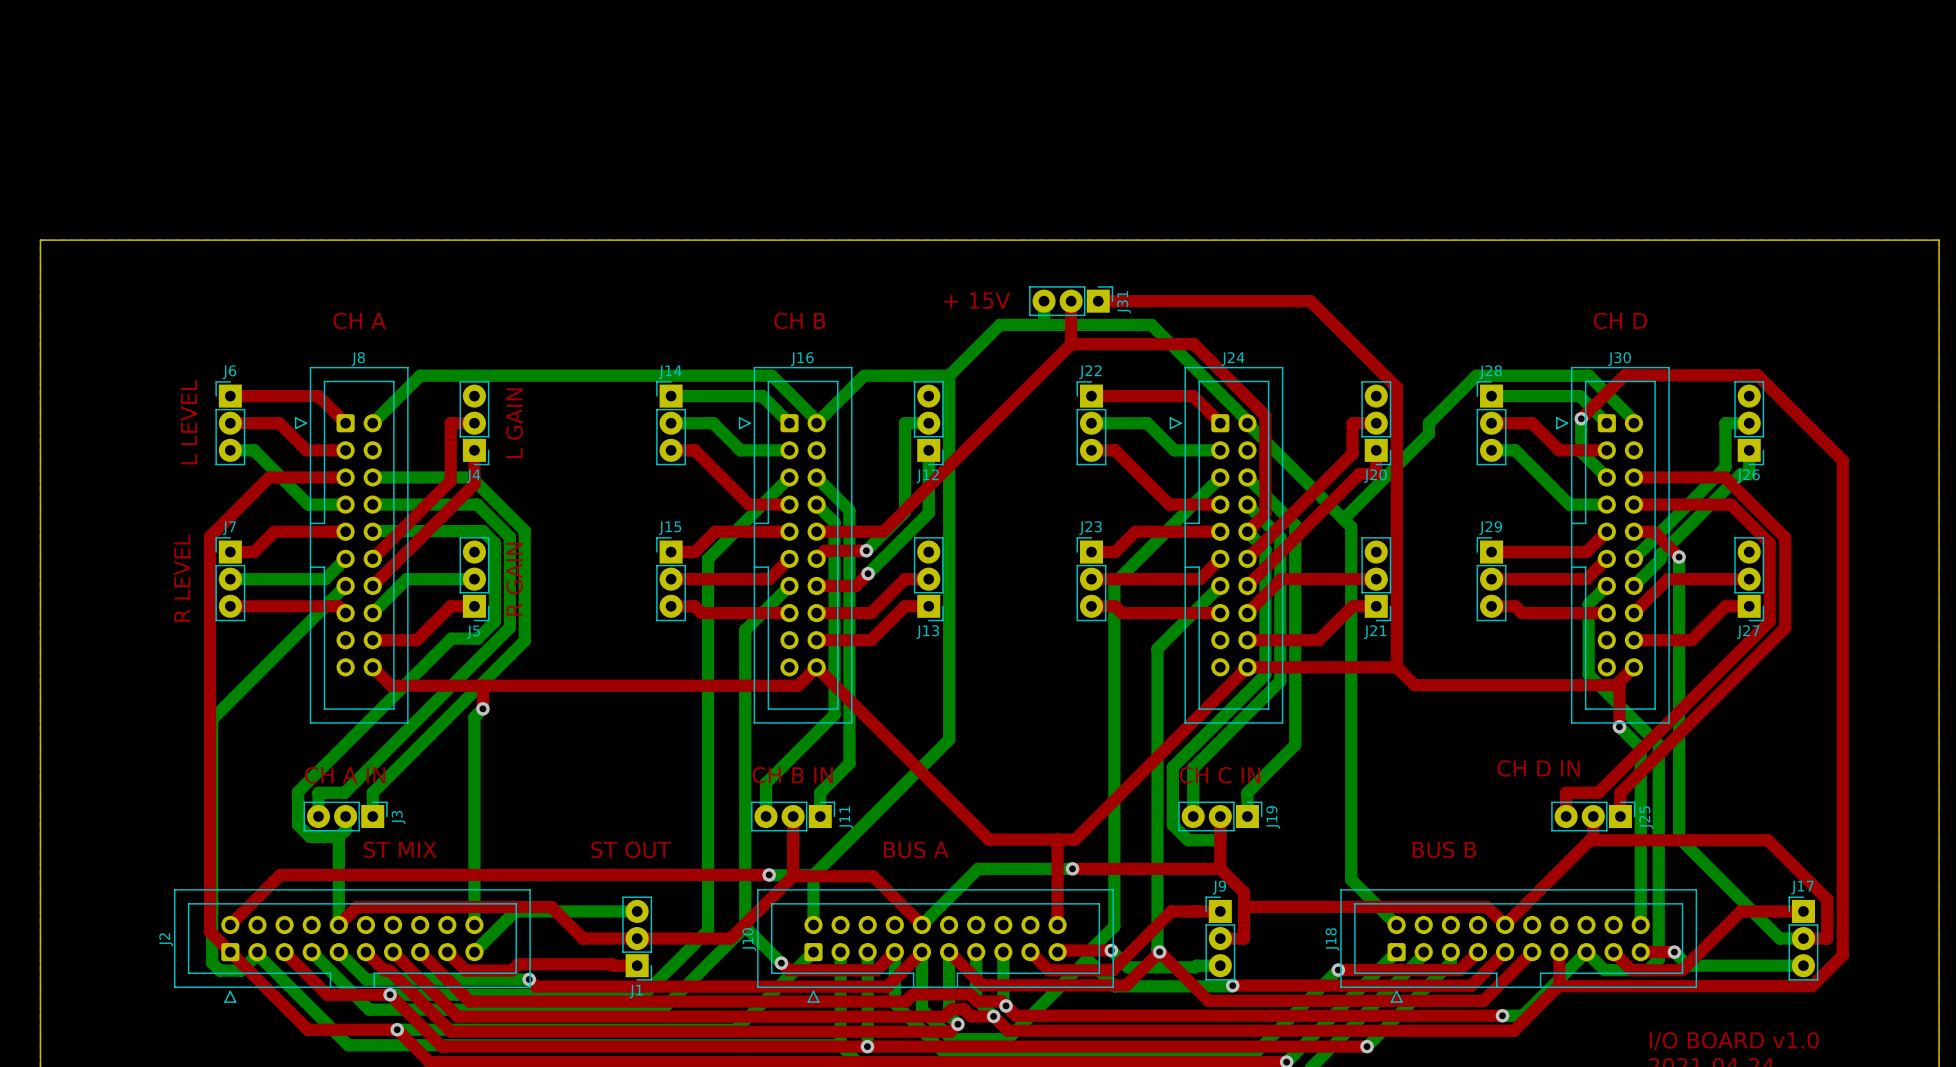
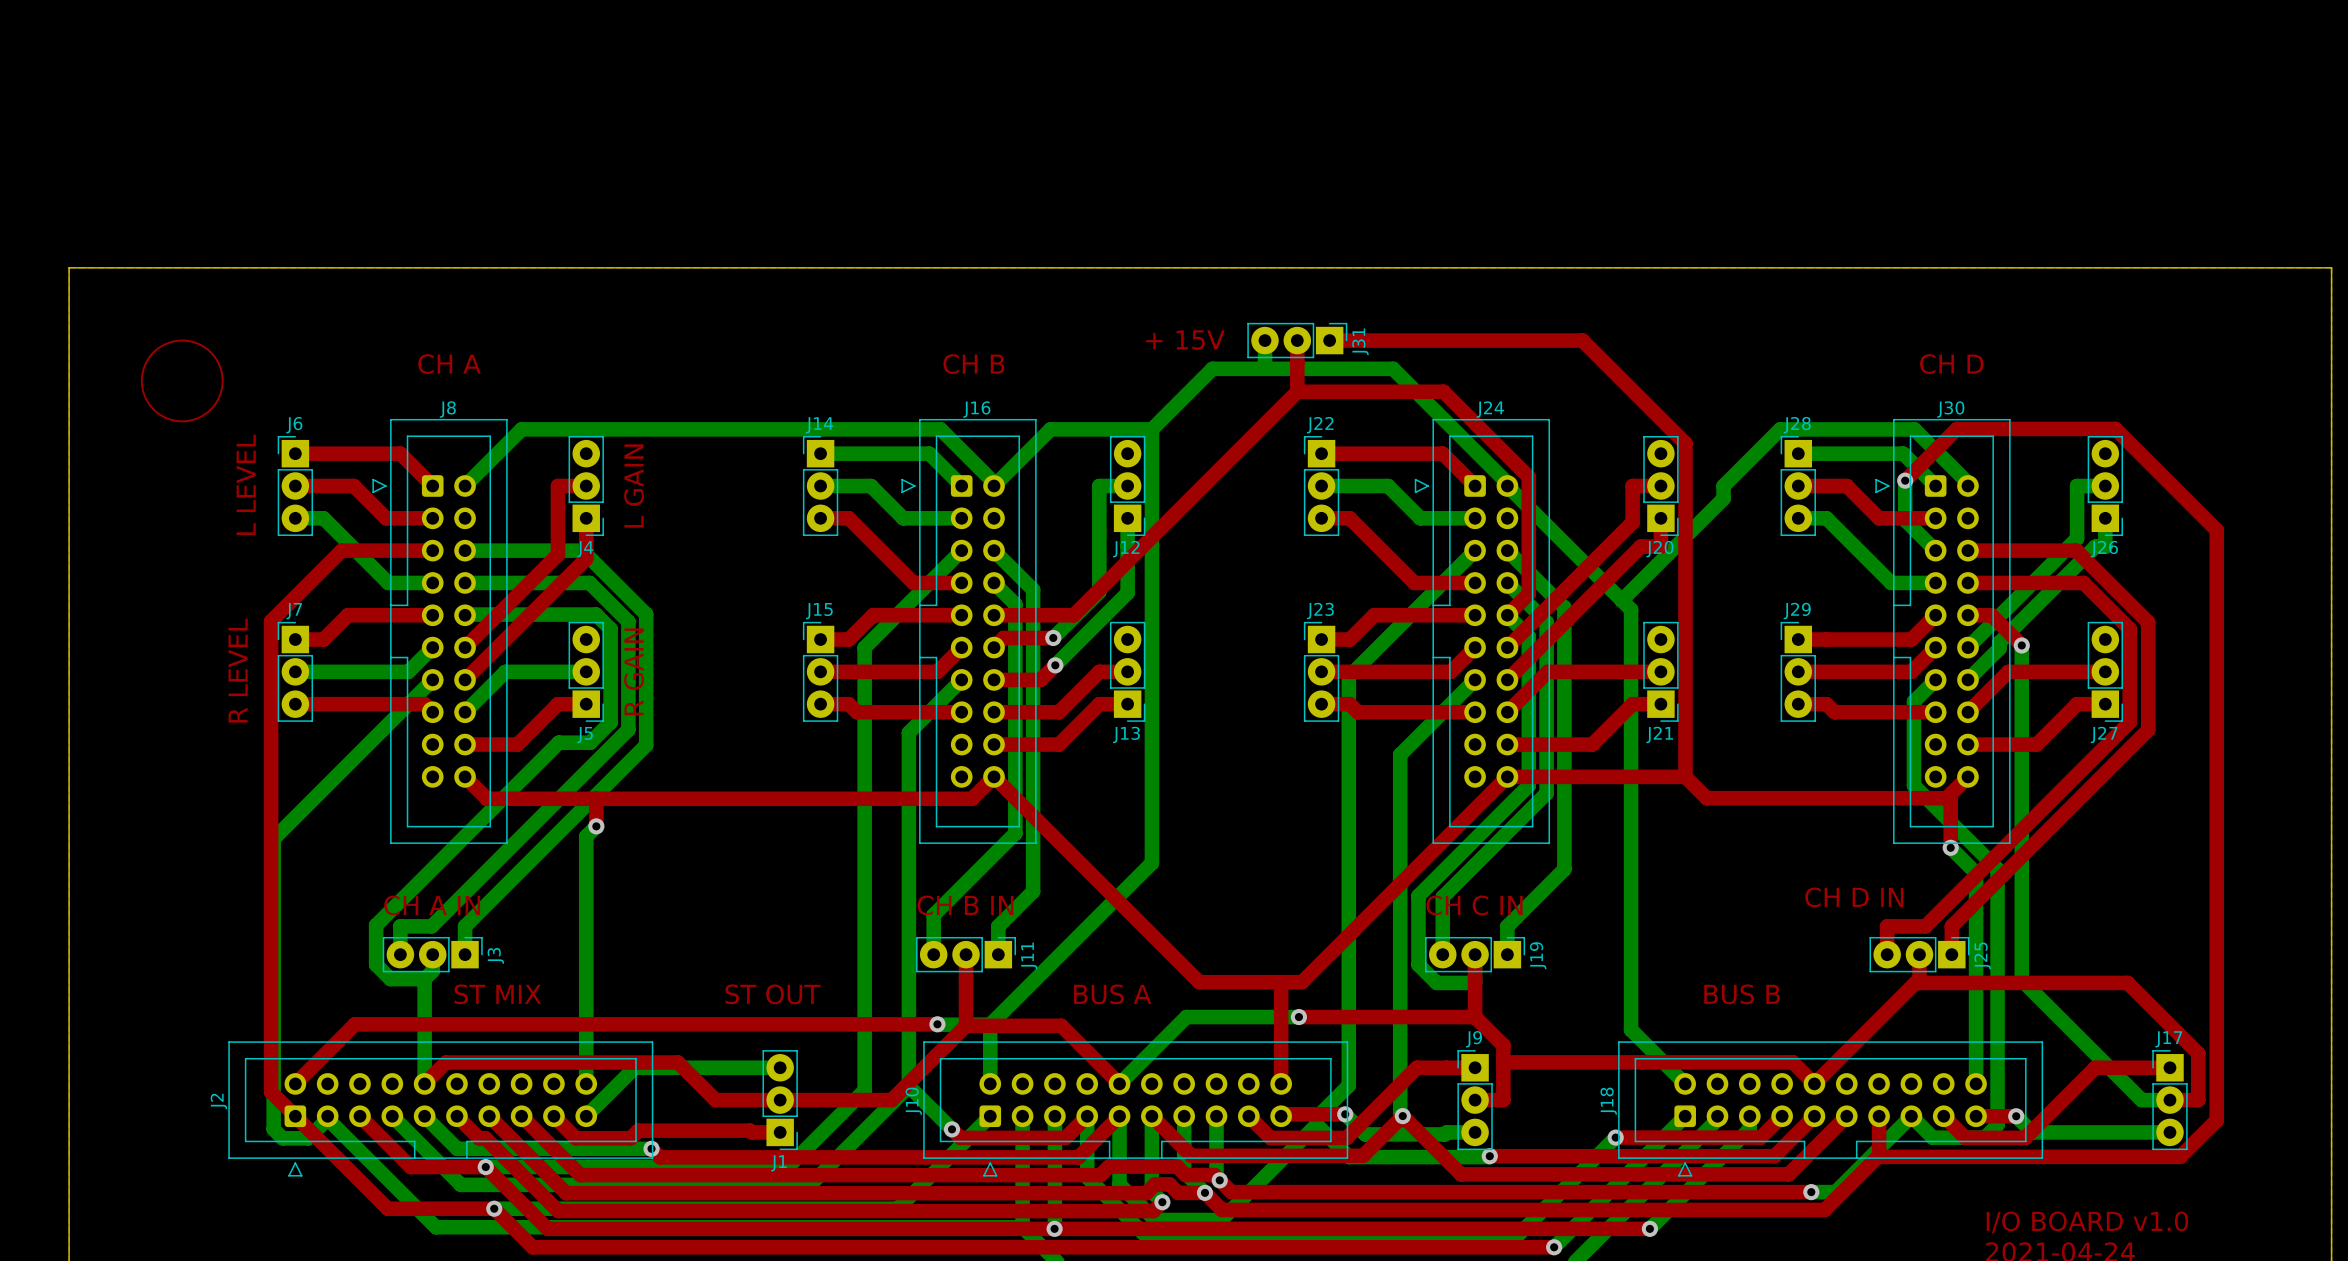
drawing: none -> [140, 339, 224, 423]

